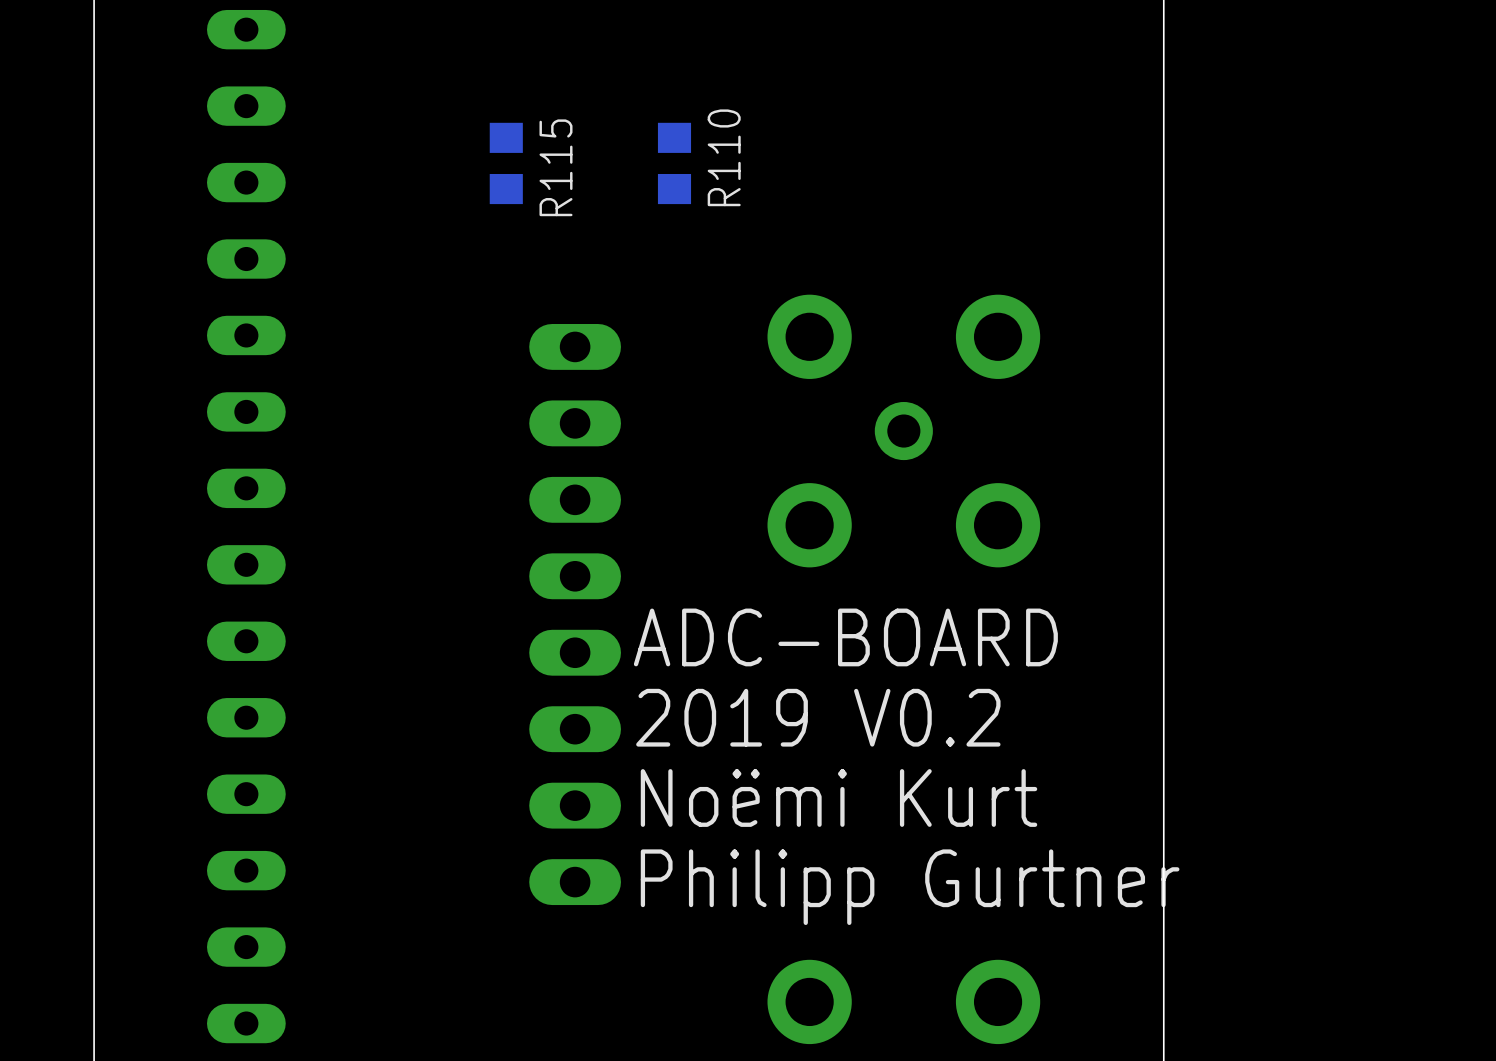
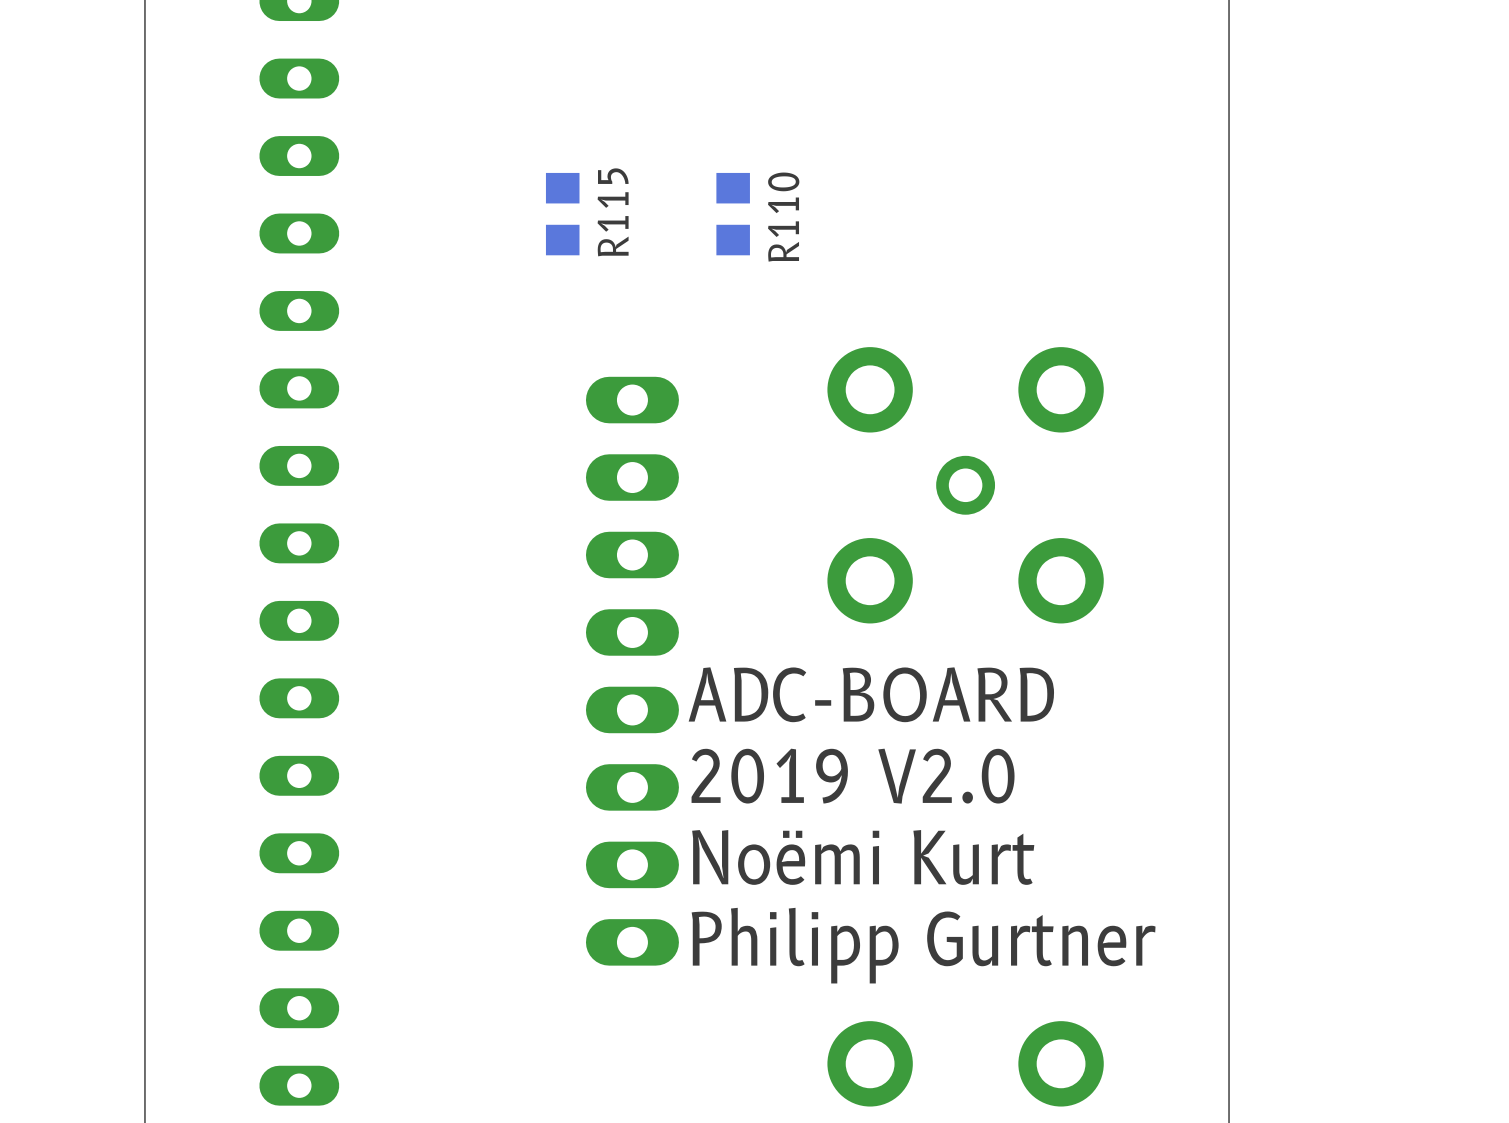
text: 2019 V0.2 (818, 717) -> 2019 V2.0 (853, 776)

